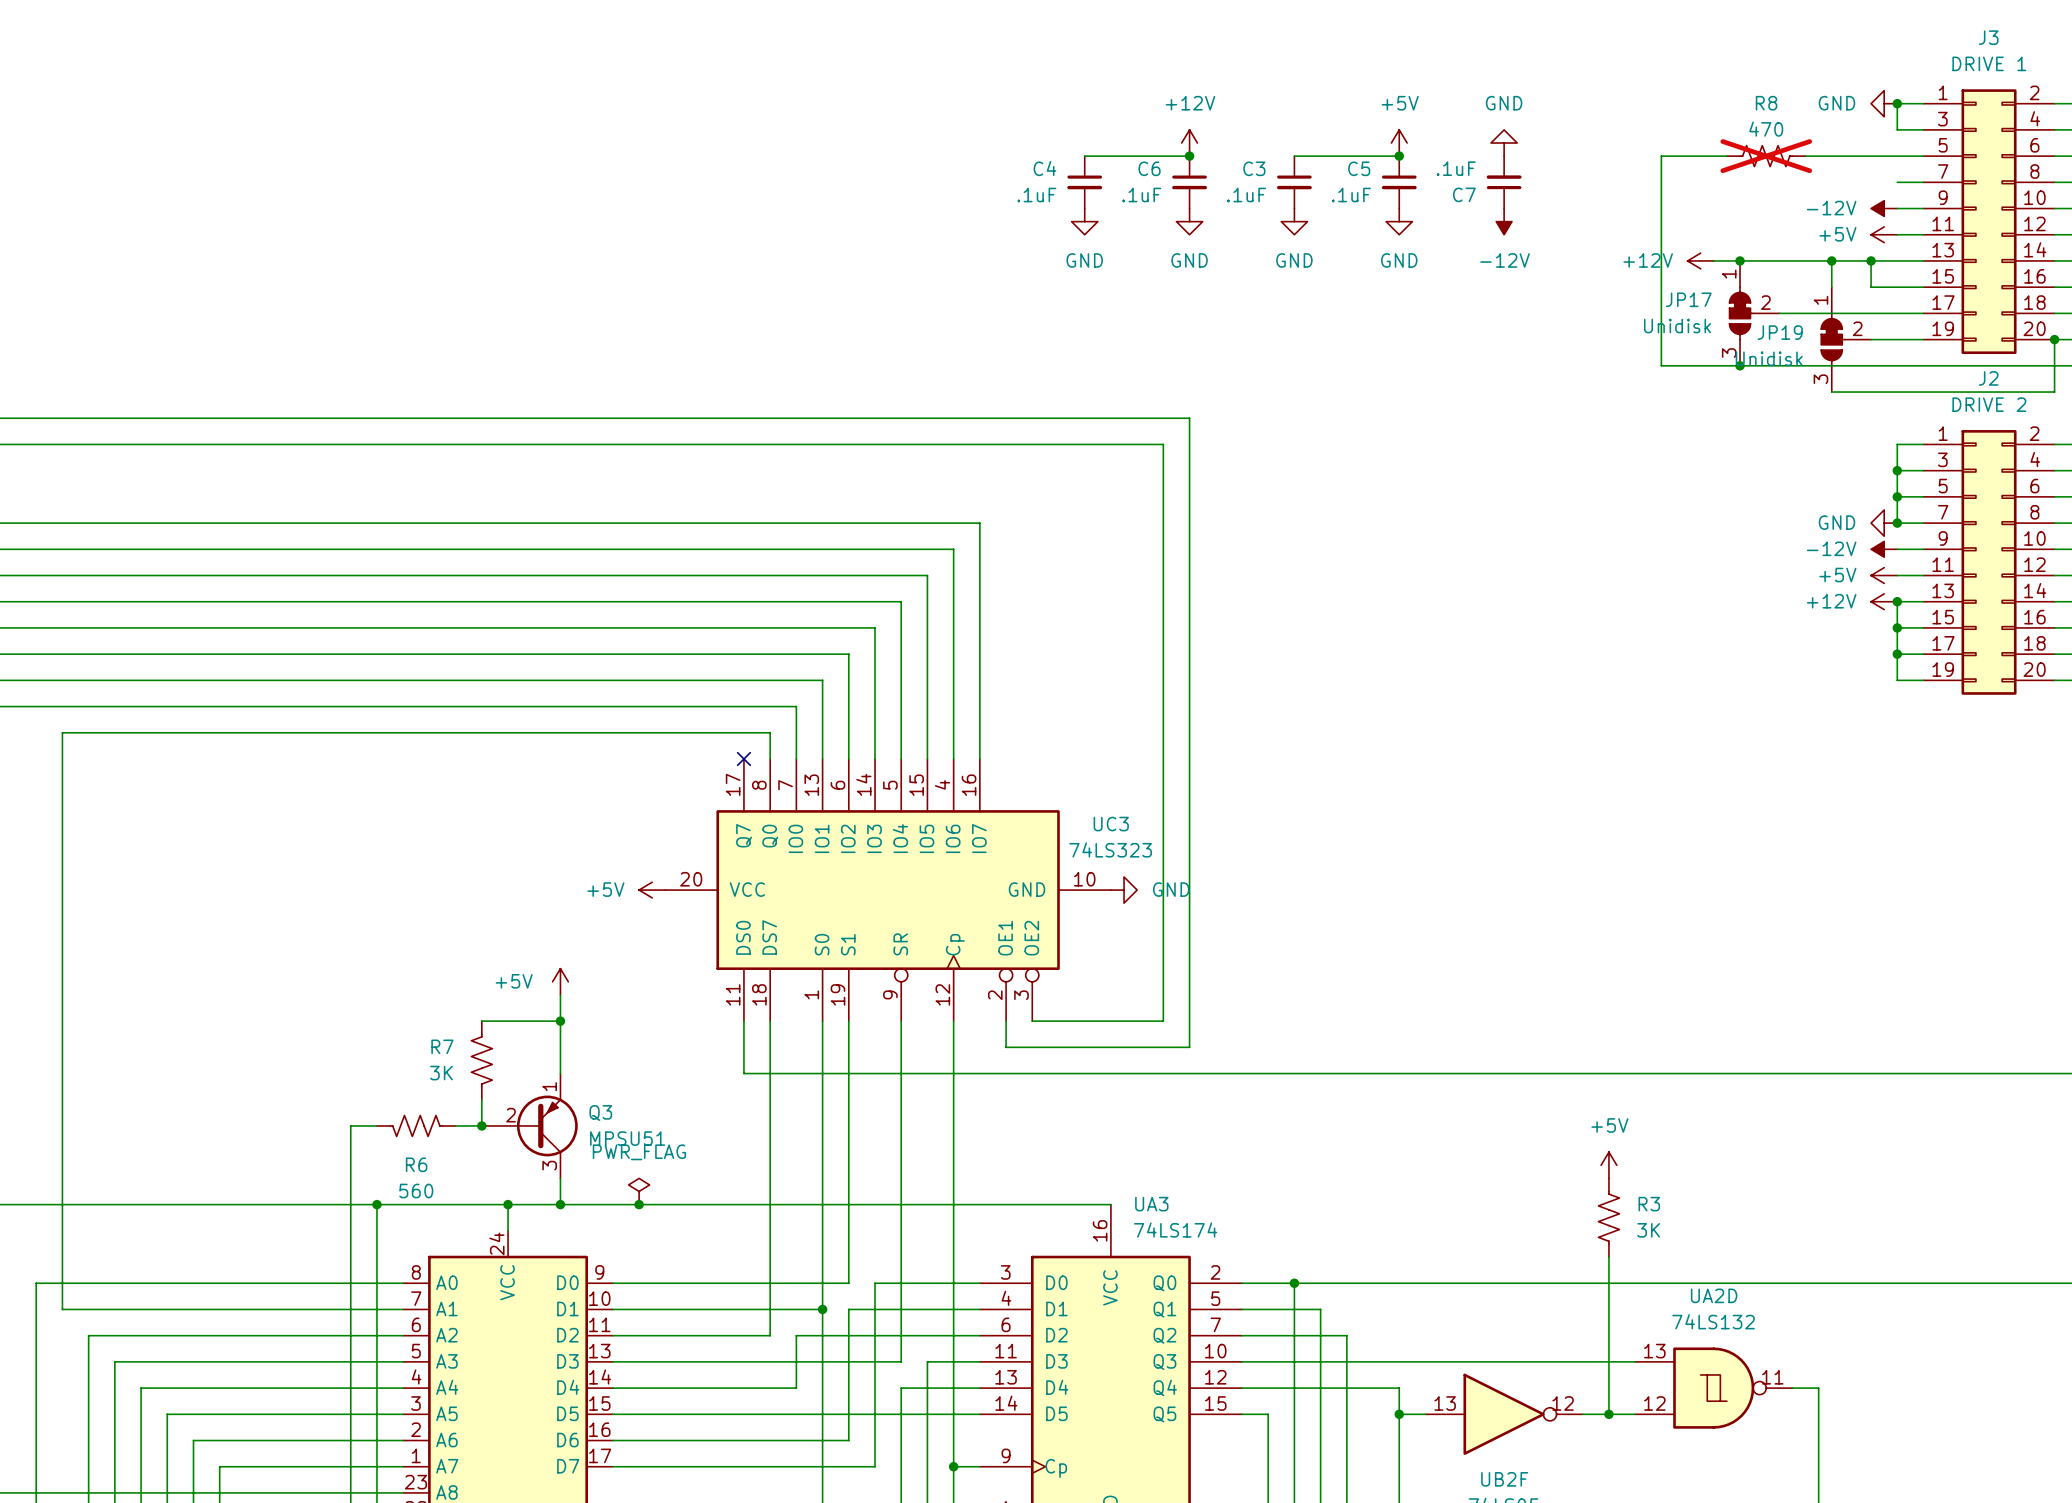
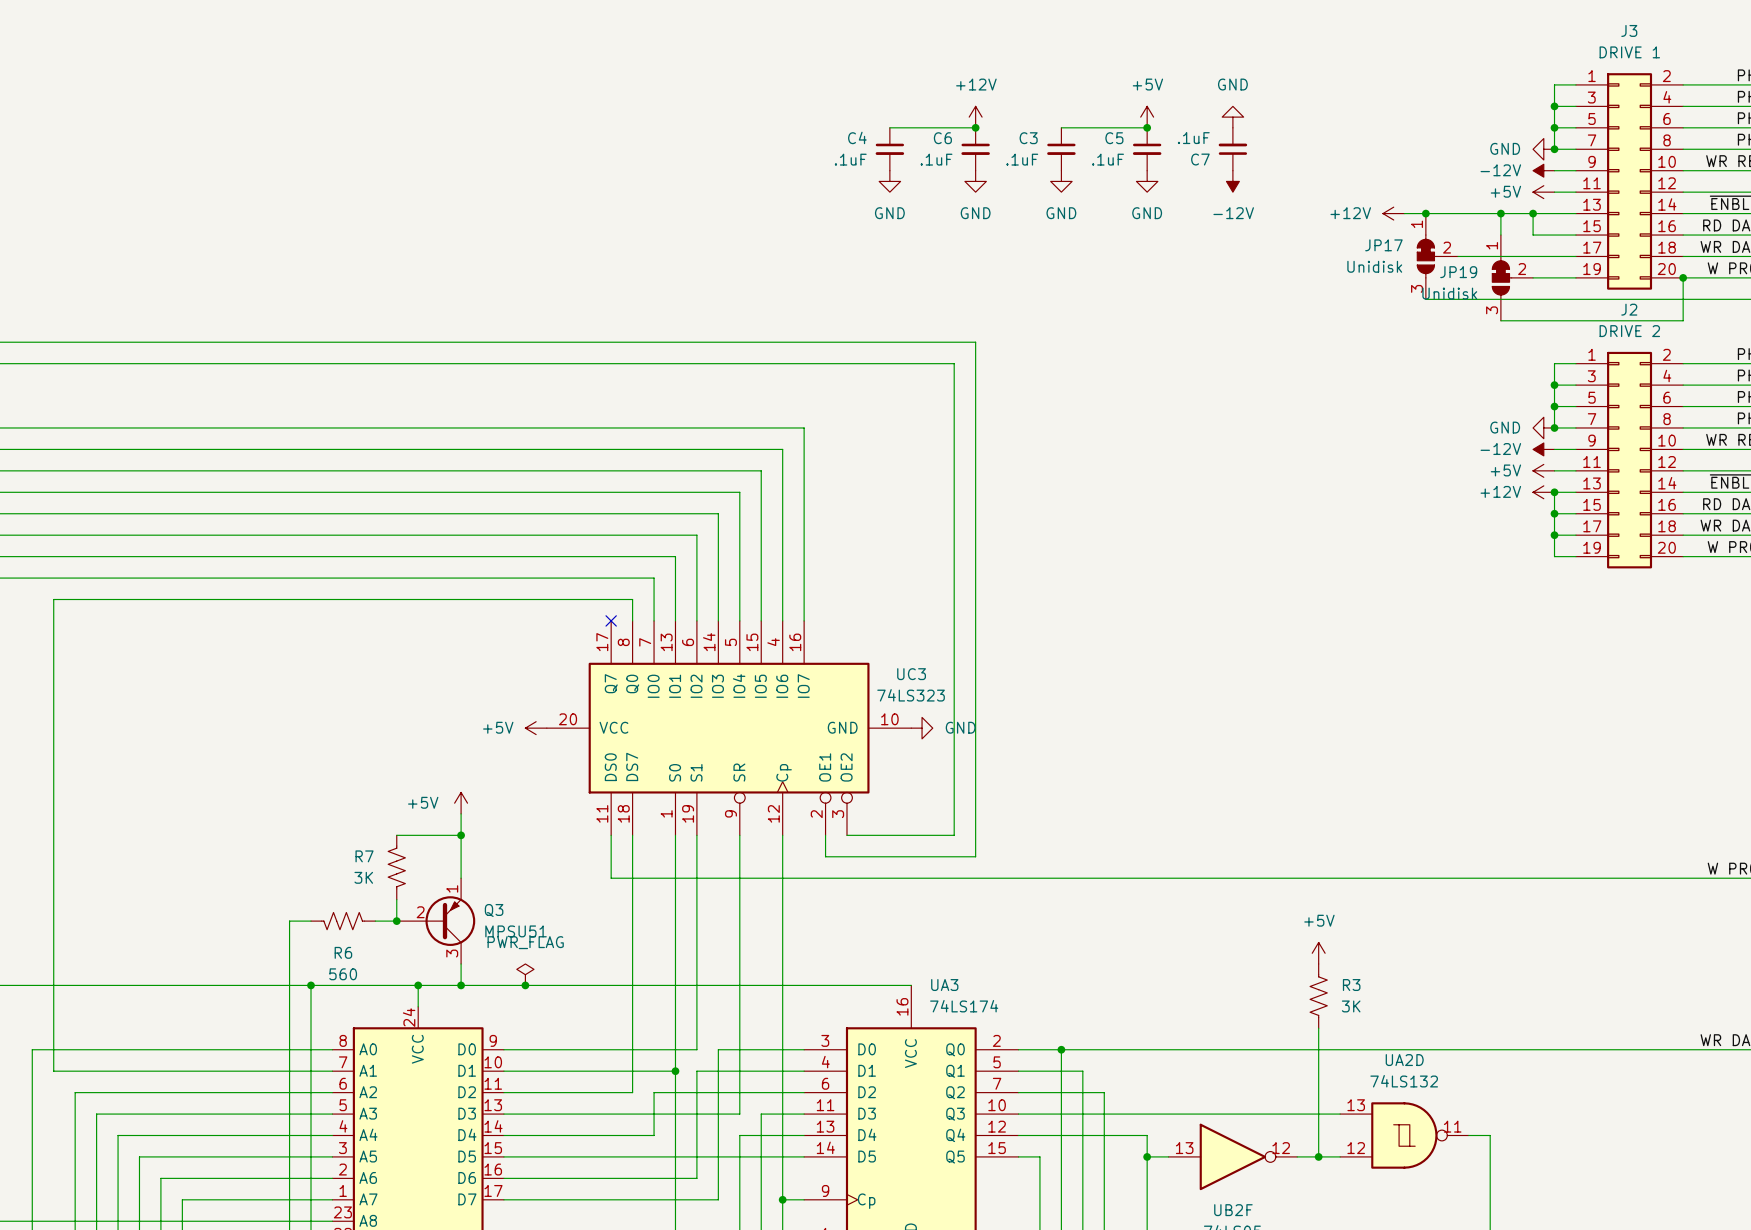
power symbol position: GND (1884, 103) -> GND (1543, 149)
junction: (1897, 103) -> none
wire: none -> (1554, 106) (1554, 149)
junction: none -> (1554, 106)
wire: (1726, 156) (1661, 156) (1661, 365) (1740, 365) -> none
R8: 470 (1766, 156) -> none
wire: (1805, 156) (1897, 156) -> none
junction: none -> (1554, 127)
junction: none -> (1554, 149)
junction: (1740, 365) -> none

